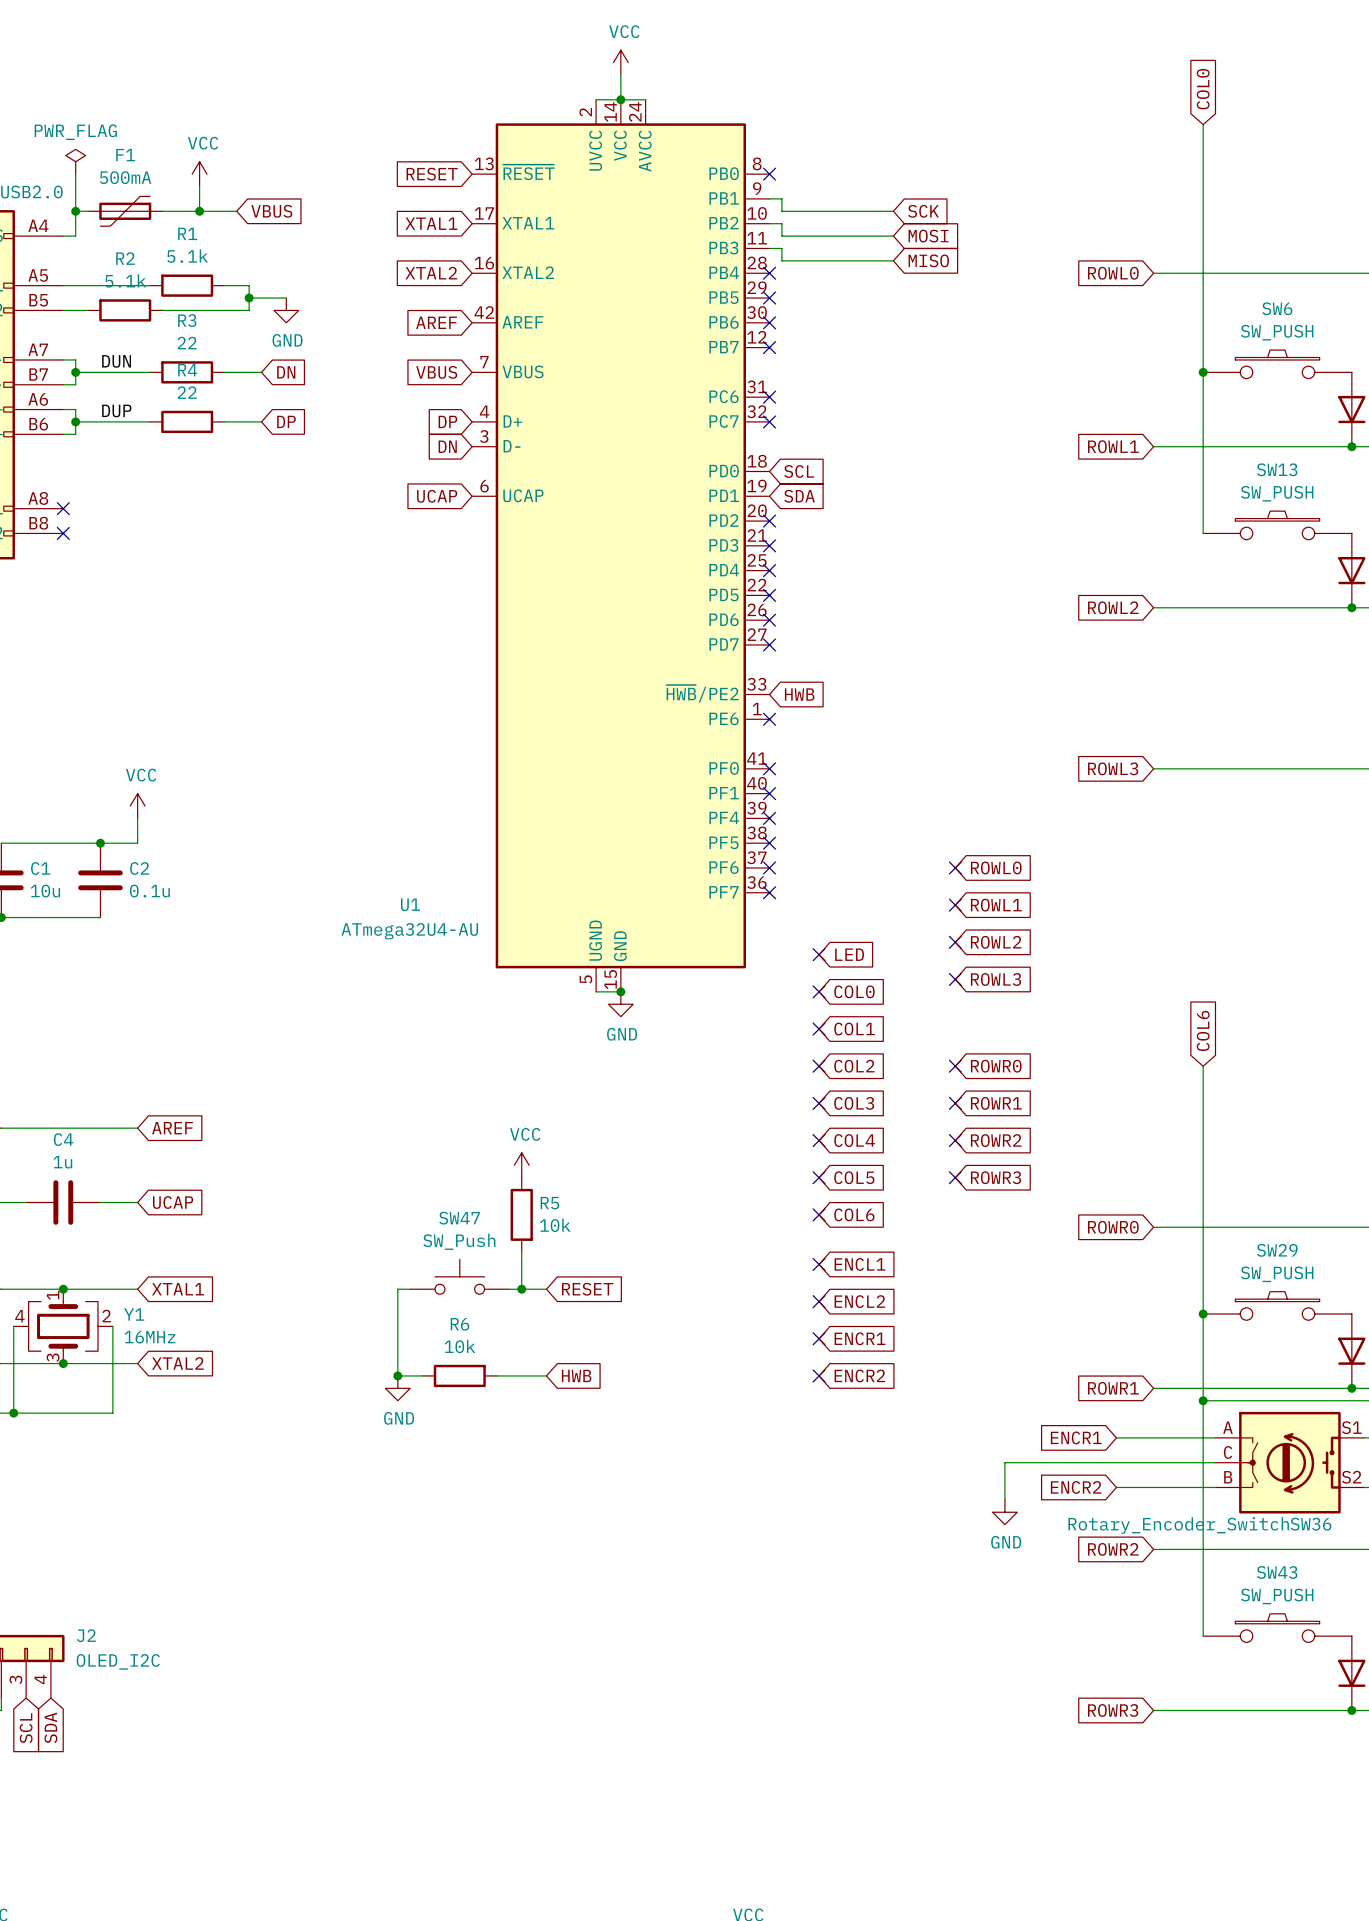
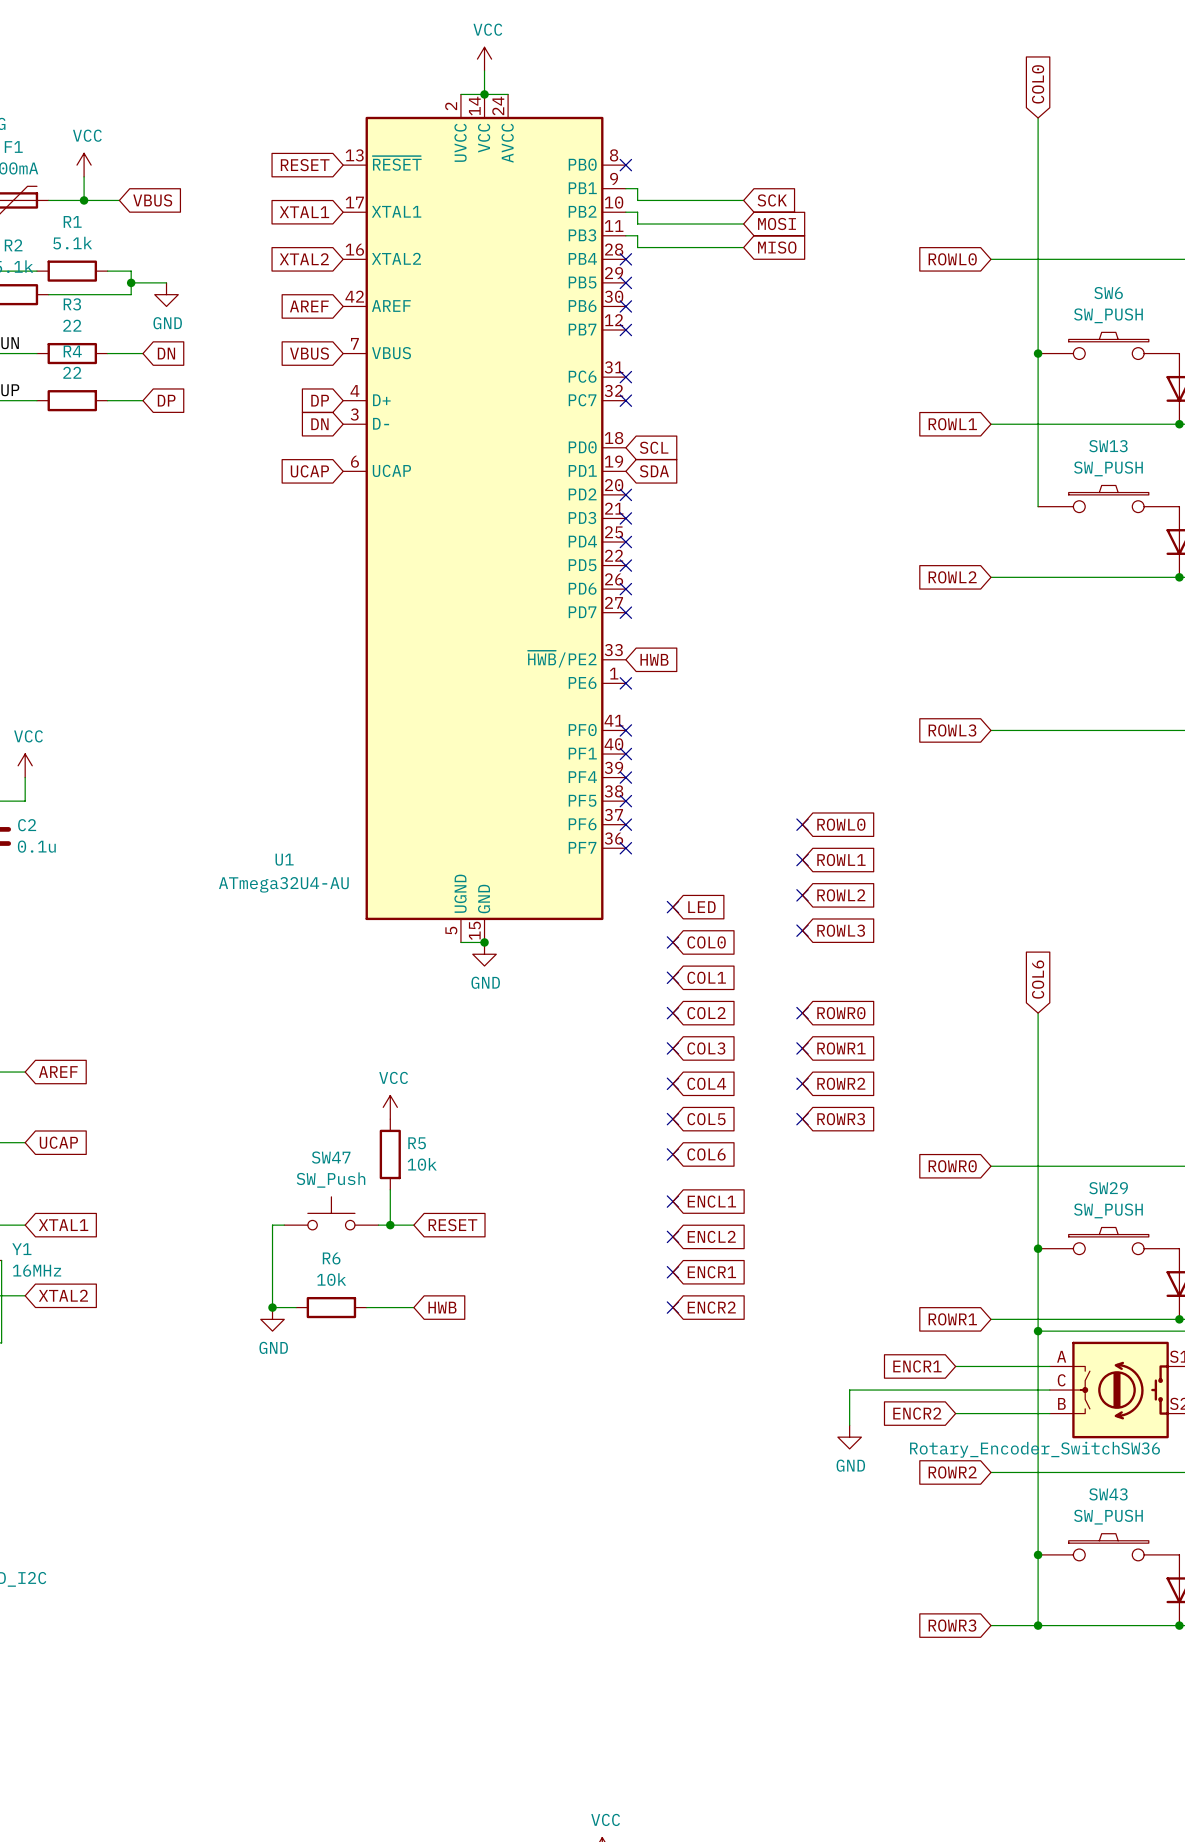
wire: none -> (1038, 1554) (1038, 1625)
junction: none -> (1038, 1554)
junction: none -> (1038, 1625)

